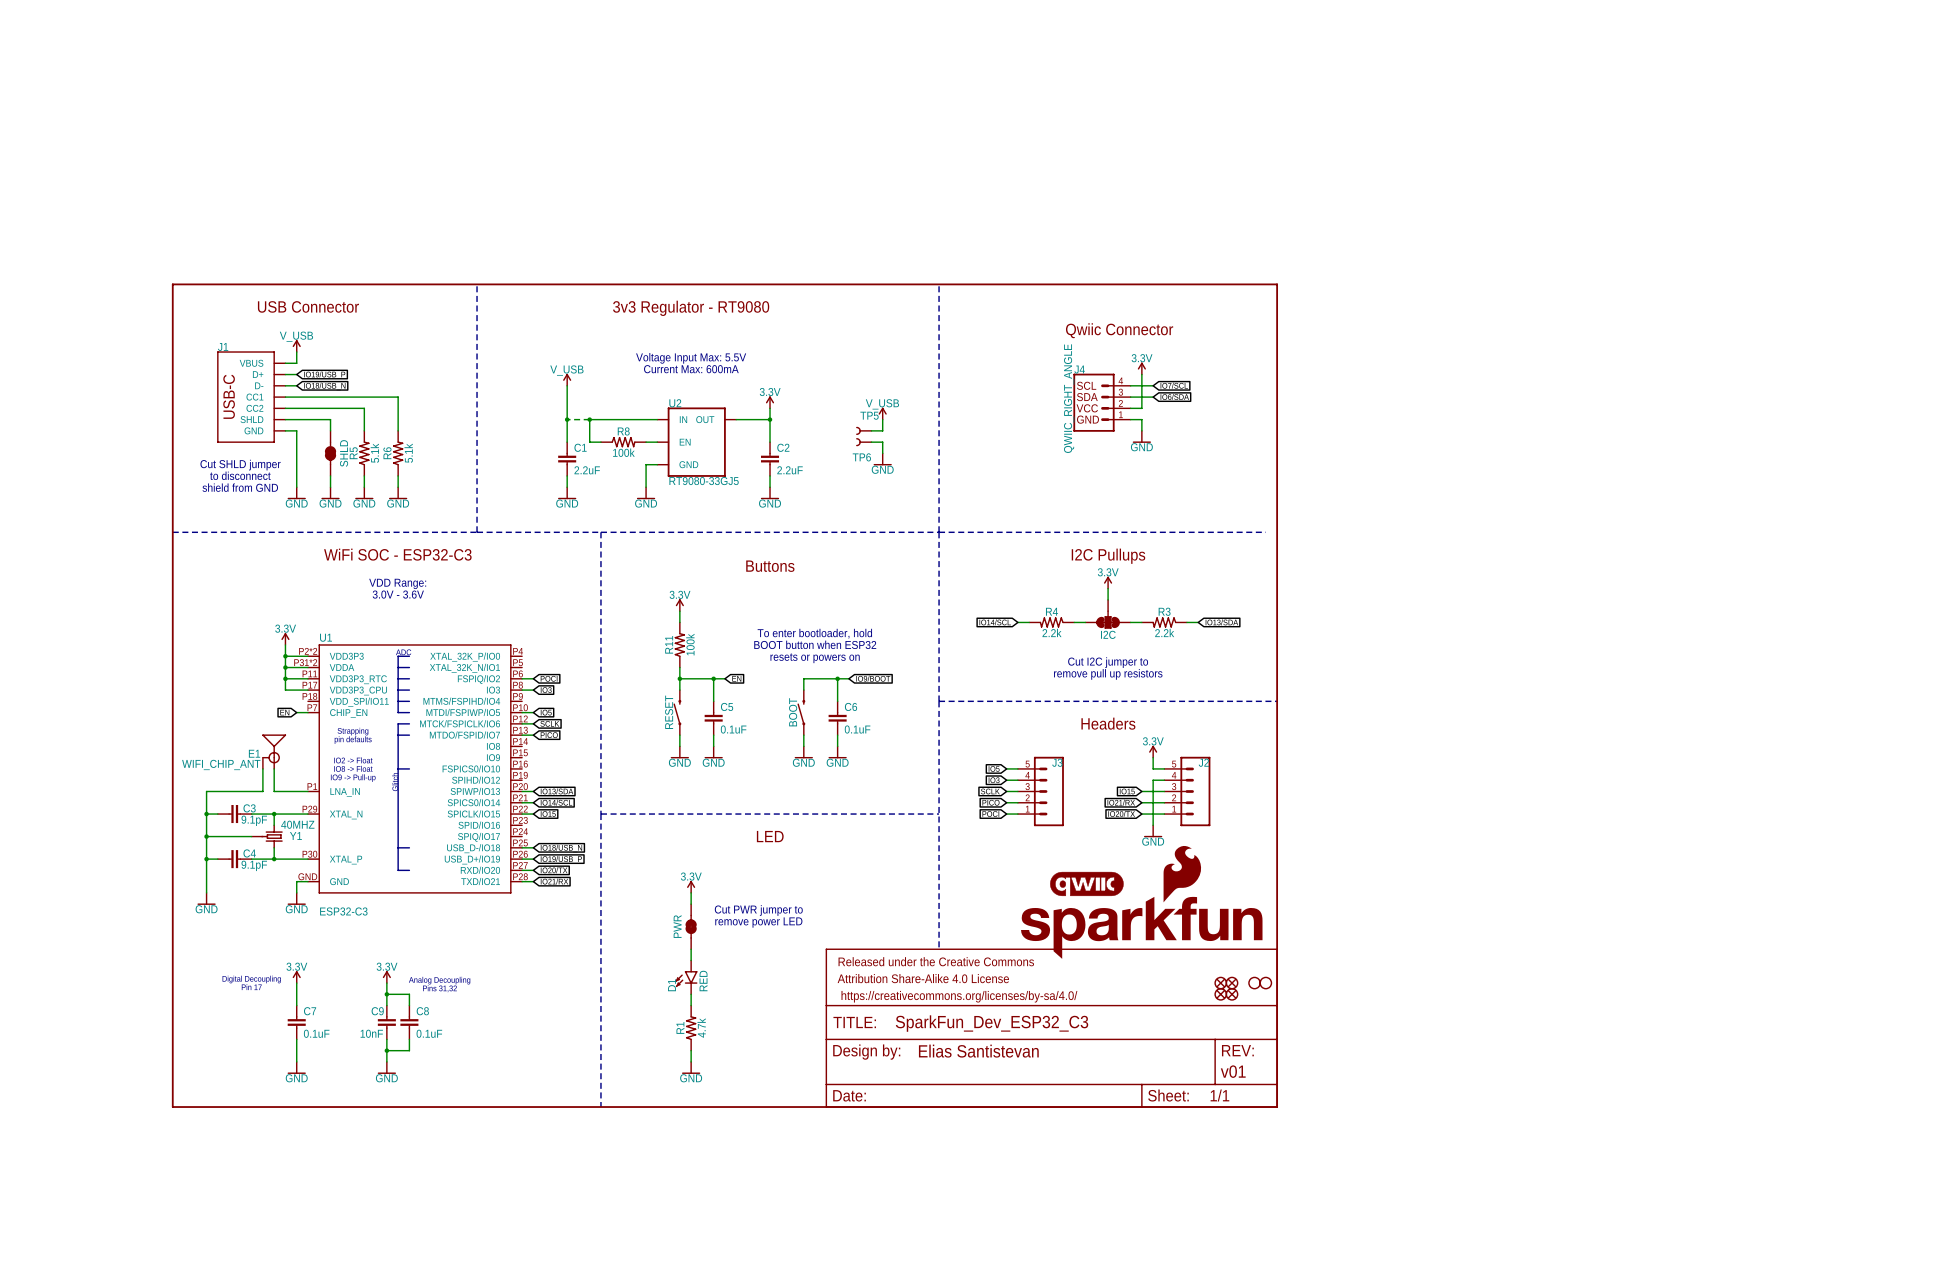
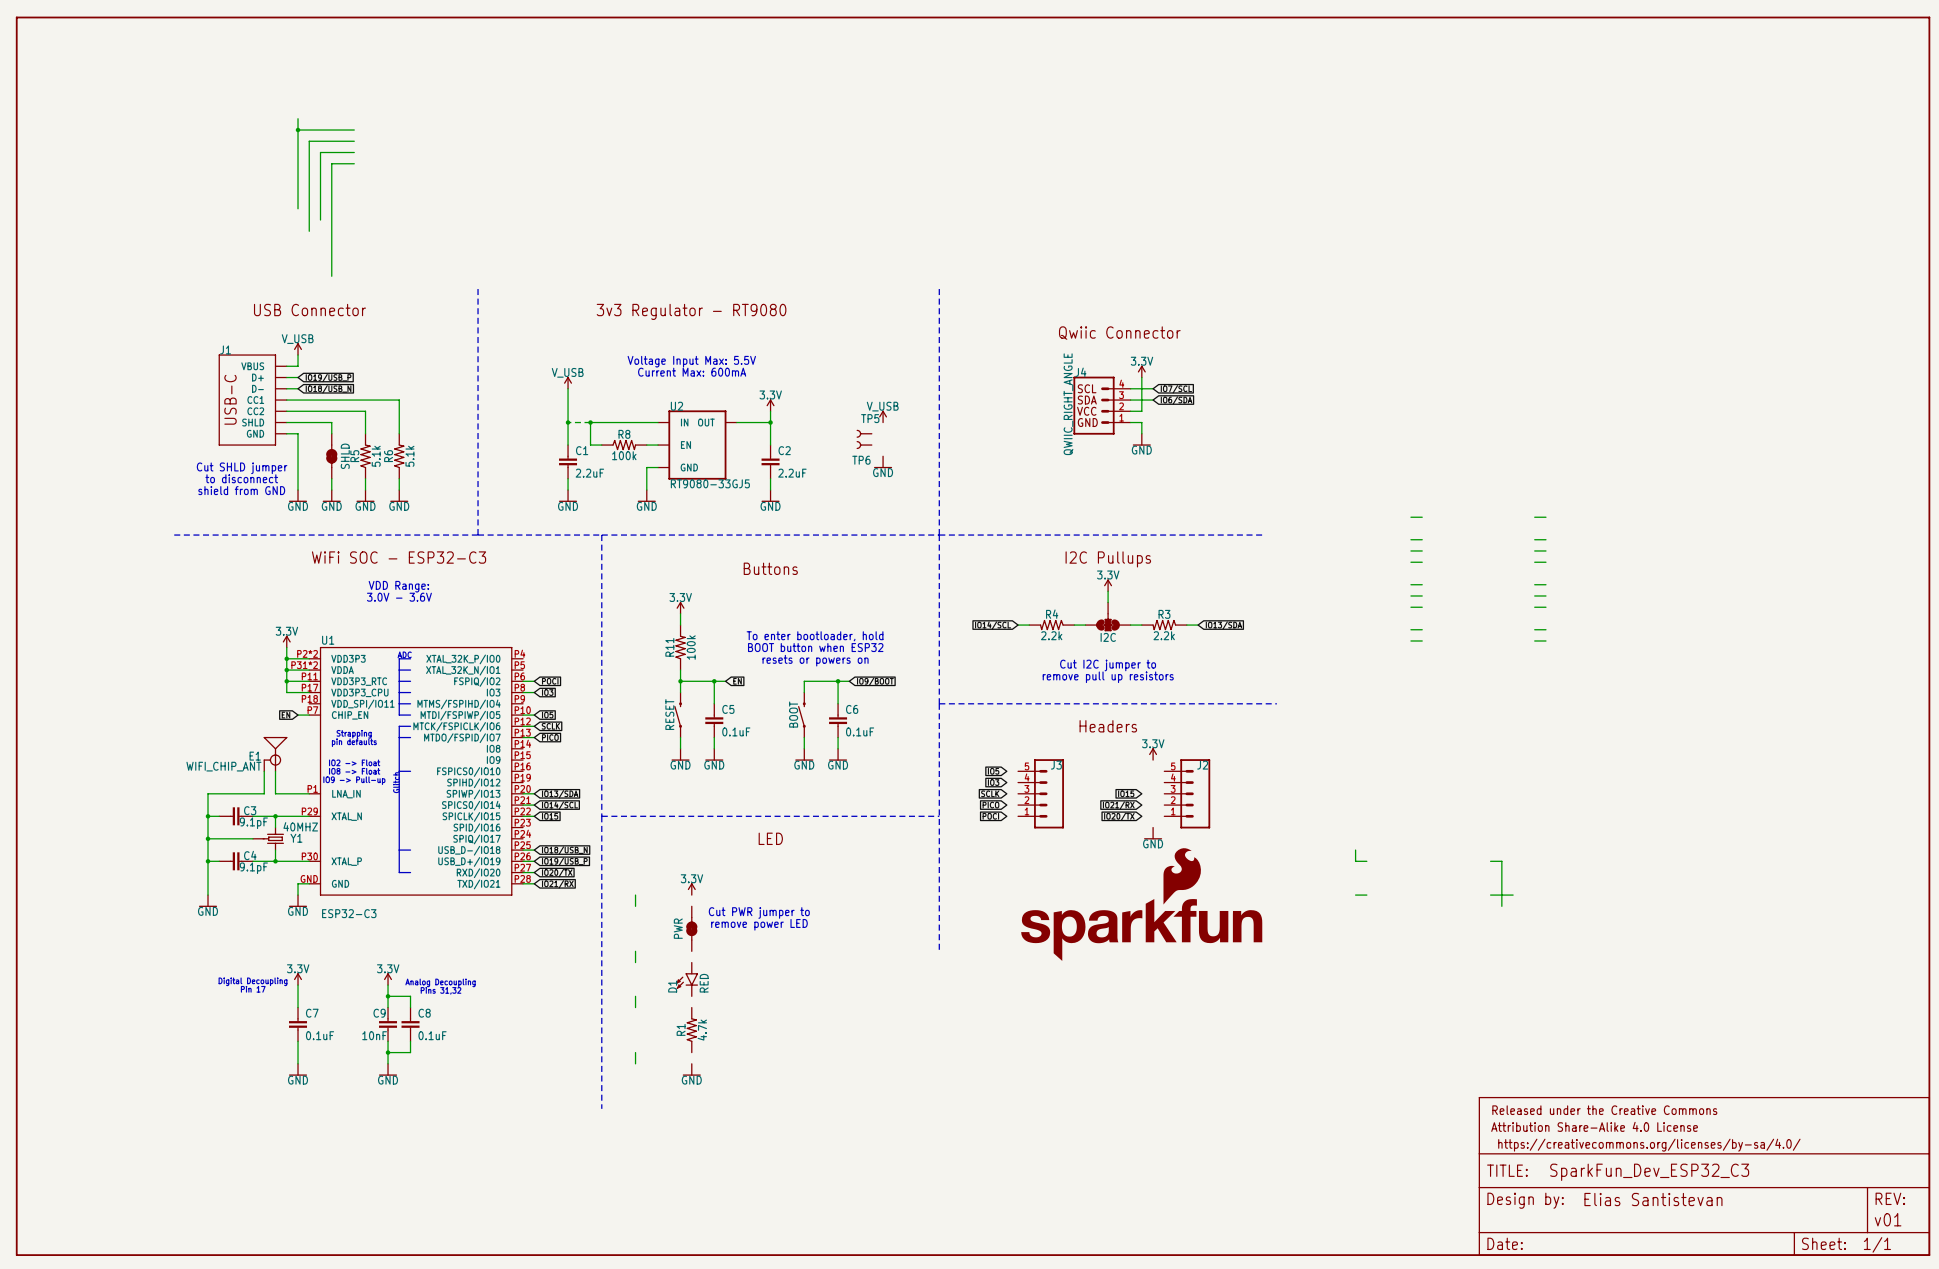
wire: none -> (298, 118) (298, 208)
wire: none -> (298, 130) (354, 130)
junction: none -> (298, 130)
wire: none -> (354, 141) (309, 141) (309, 231)
wire: none -> (354, 152) (320, 152) (320, 220)
wire: none -> (354, 163) (331, 163) (331, 276)
wire: (882, 419) (882, 430) (871, 430) -> none
wire: (871, 442) (882, 442) (882, 453) -> none
wire: none -> (1410, 517) (1422, 517)
wire: none -> (1534, 517) (1545, 517)
wire: none -> (1410, 539) (1422, 539)
wire: none -> (1534, 539) (1545, 539)
wire: none -> (1410, 550) (1422, 550)
wire: none -> (1534, 550) (1545, 550)
wire: none -> (1410, 562) (1422, 562)
wire: none -> (1534, 562) (1545, 562)
wire: none -> (1410, 584) (1422, 584)
wire: none -> (1534, 584) (1545, 584)
wire: none -> (1410, 595) (1422, 595)
wire: none -> (1534, 595) (1545, 595)
wire: none -> (1410, 607) (1422, 607)
wire: none -> (1534, 607) (1545, 607)
wire: none -> (1410, 629) (1422, 629)
wire: none -> (1534, 629) (1545, 629)
part: none -> (973, 636)
wire: none -> (1410, 640) (1422, 640)
wire: none -> (1534, 640) (1545, 640)
part: (724, 695) -> none
wire: (1153, 757) (1153, 768) (1164, 768) -> none
wire: (1006, 768) (1017, 768) -> none
wire: (1006, 780) (1017, 780) -> none
wire: (1164, 780) (1153, 780) (1153, 825) -> none
wire: (1006, 791) (1017, 791) -> none
wire: (1141, 791) (1164, 791) -> none
wire: (1006, 802) (1017, 802) -> none
wire: (1141, 802) (1164, 802) -> none
wire: (1006, 814) (1017, 814) -> none
wire: (1141, 814) (1164, 814) -> none
wire: none -> (1355, 850) (1355, 861) (1366, 861)
wire: none -> (1490, 861) (1501, 861) (1501, 906)
part: (1086, 883) -> none
wire: (691, 892) (691, 904) -> (635, 895) (635, 906)
wire: none -> (1355, 895) (1366, 895)
wire: none -> (1490, 895) (1513, 895)
wire: (691, 949) (691, 960) -> (635, 951) (635, 962)
part: (1220, 983) -> none
part: (1232, 983) -> none
part: (1254, 983) -> none
part: (1265, 983) -> none
wire: (691, 994) (691, 1005) -> (635, 996) (635, 1007)
part: (1220, 994) -> none
part: (1232, 994) -> none
part: (1051, 1028) -> none
wire: (691, 1050) (691, 1061) -> (635, 1052) (635, 1063)
part: none -> (1704, 1176)

